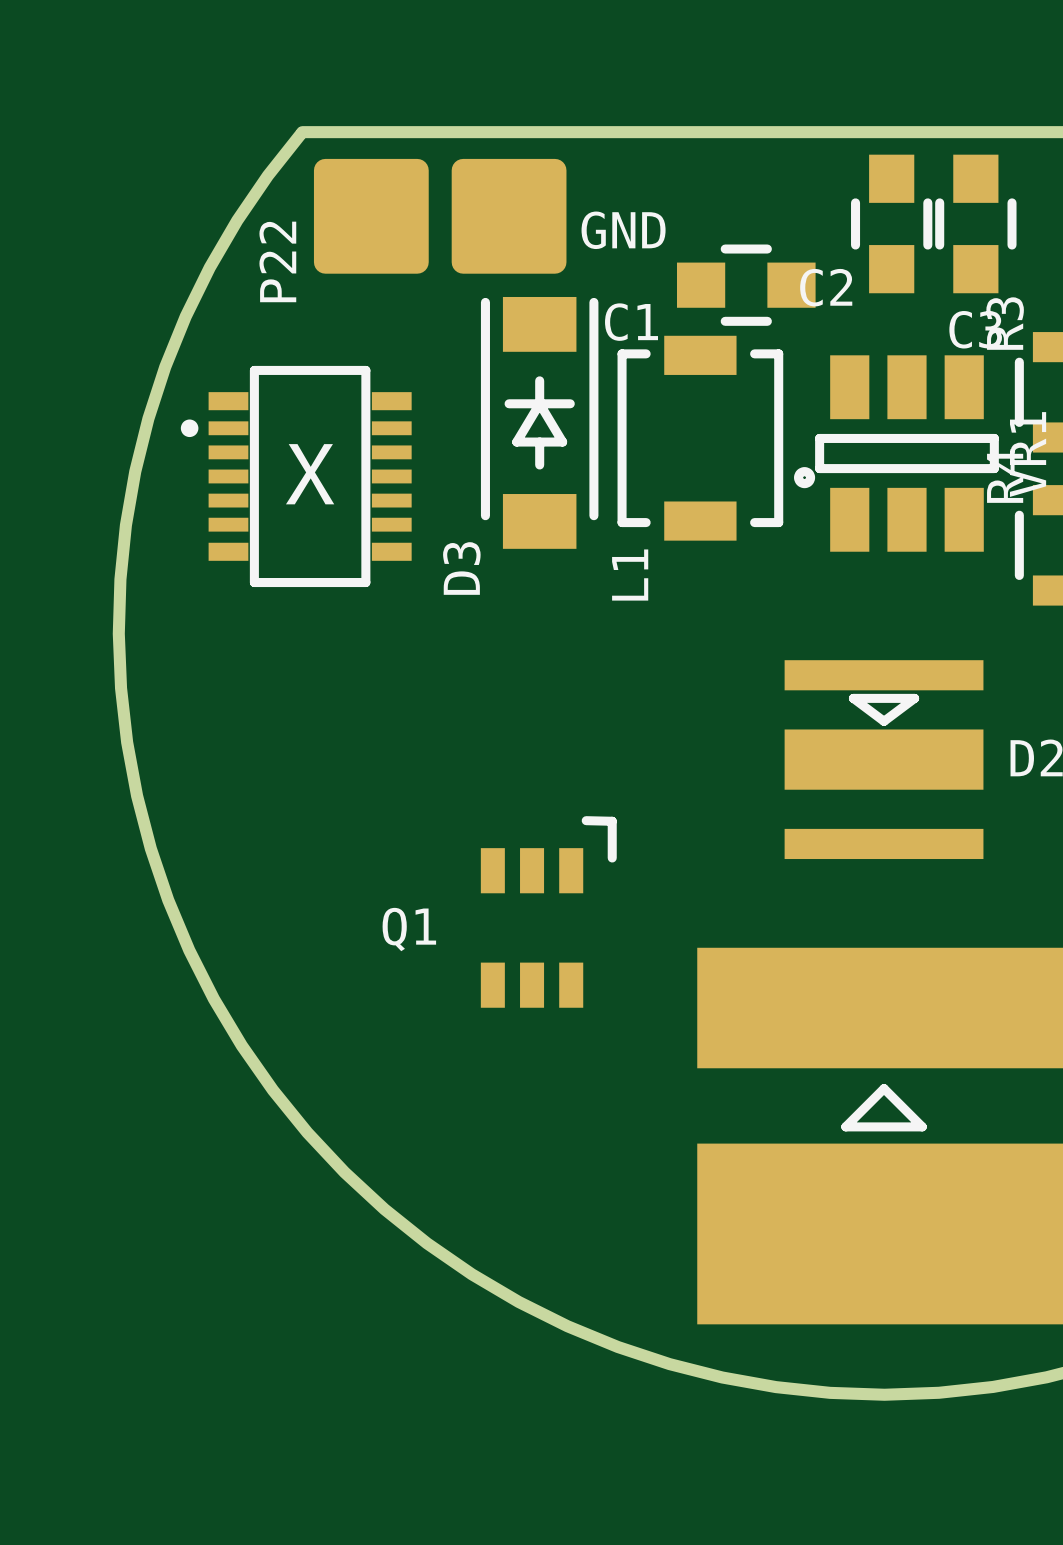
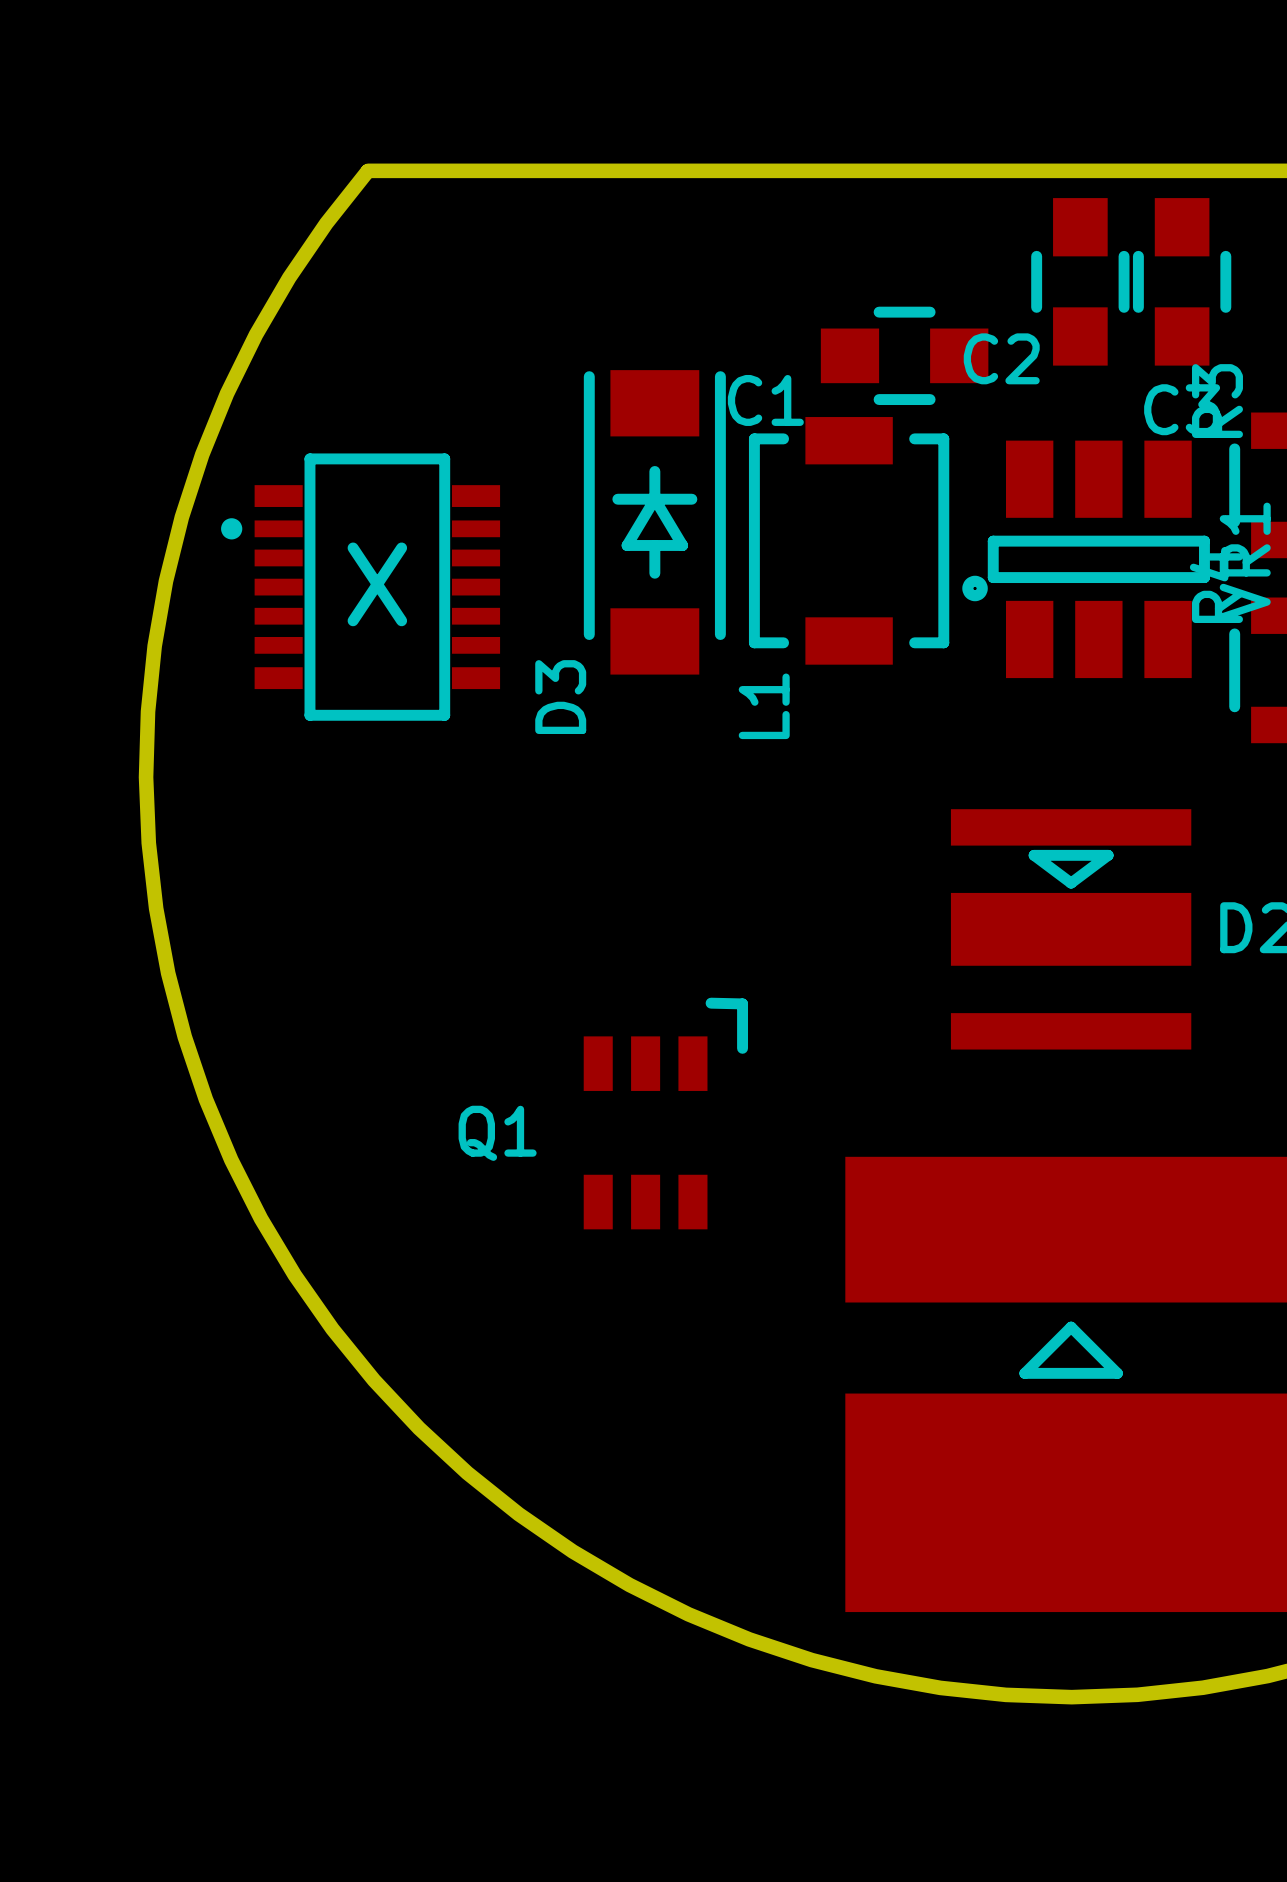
part: (371, 216) -> none
part: (509, 216) -> none
text: GND (623, 230) -> none
text: P22 (277, 261) -> none

